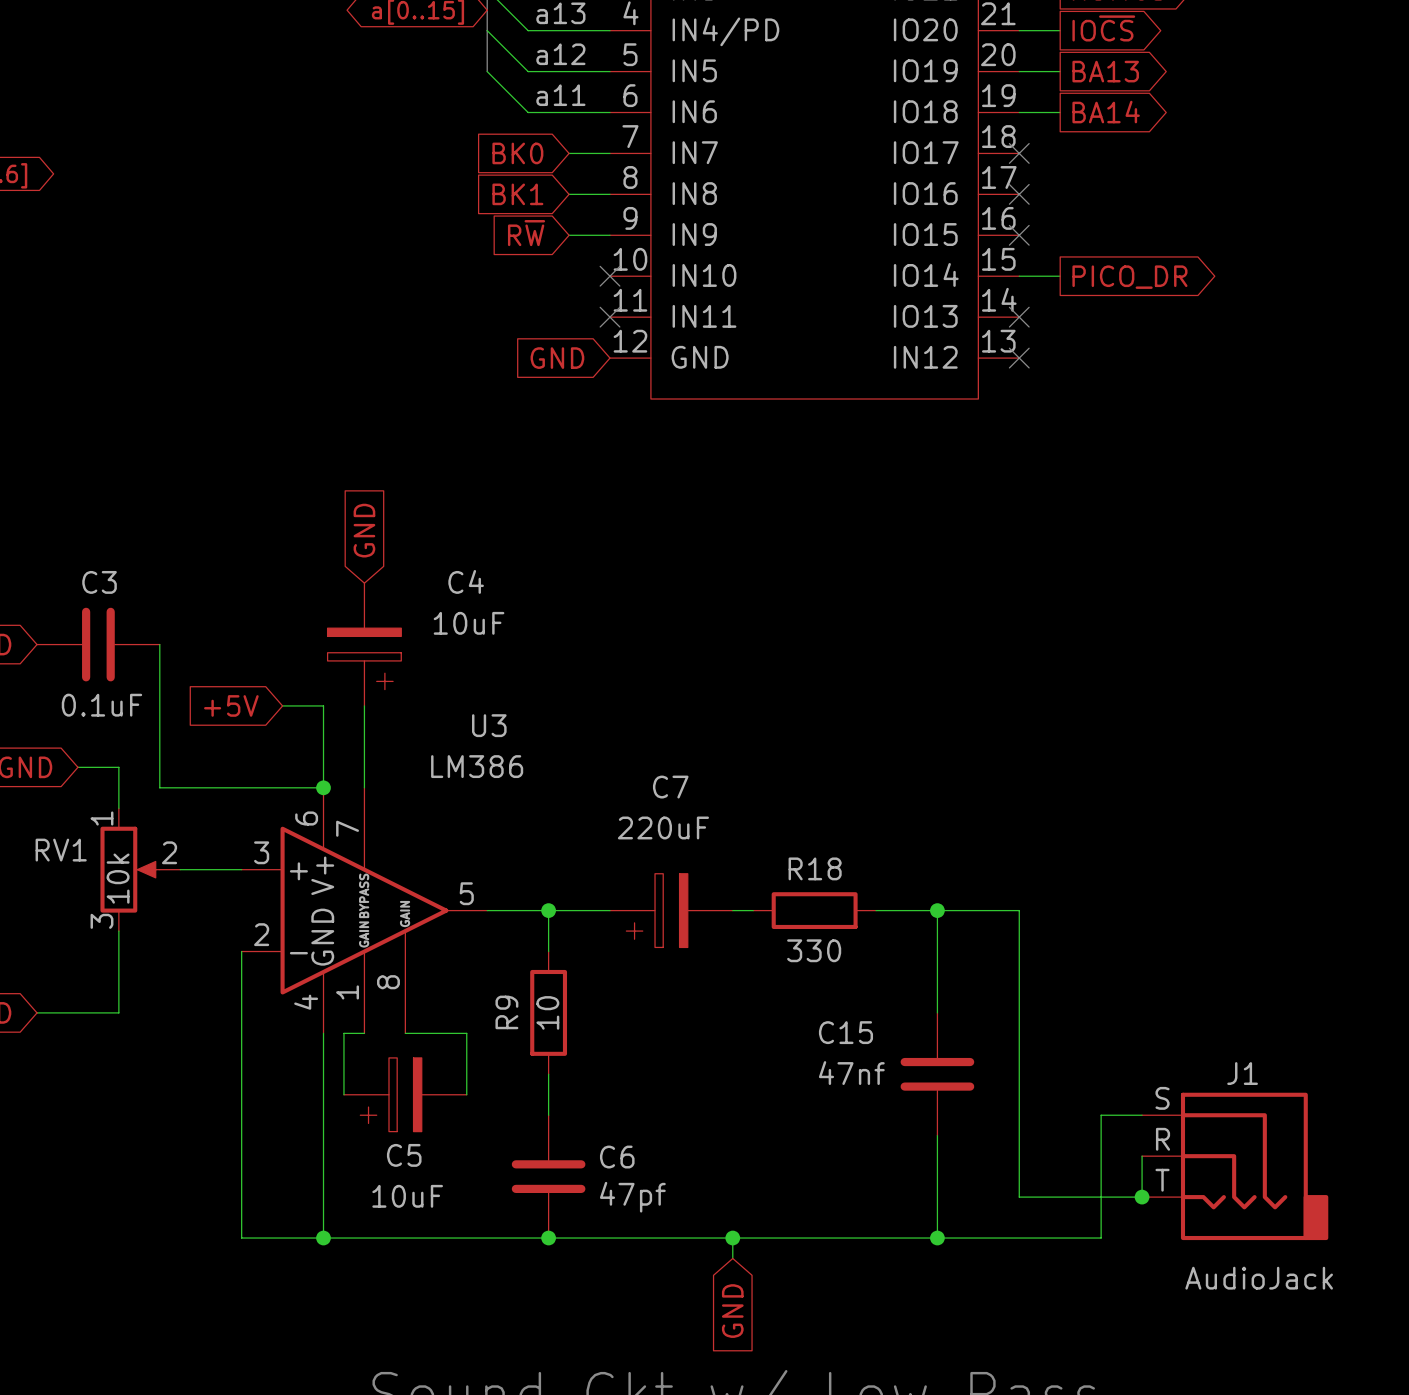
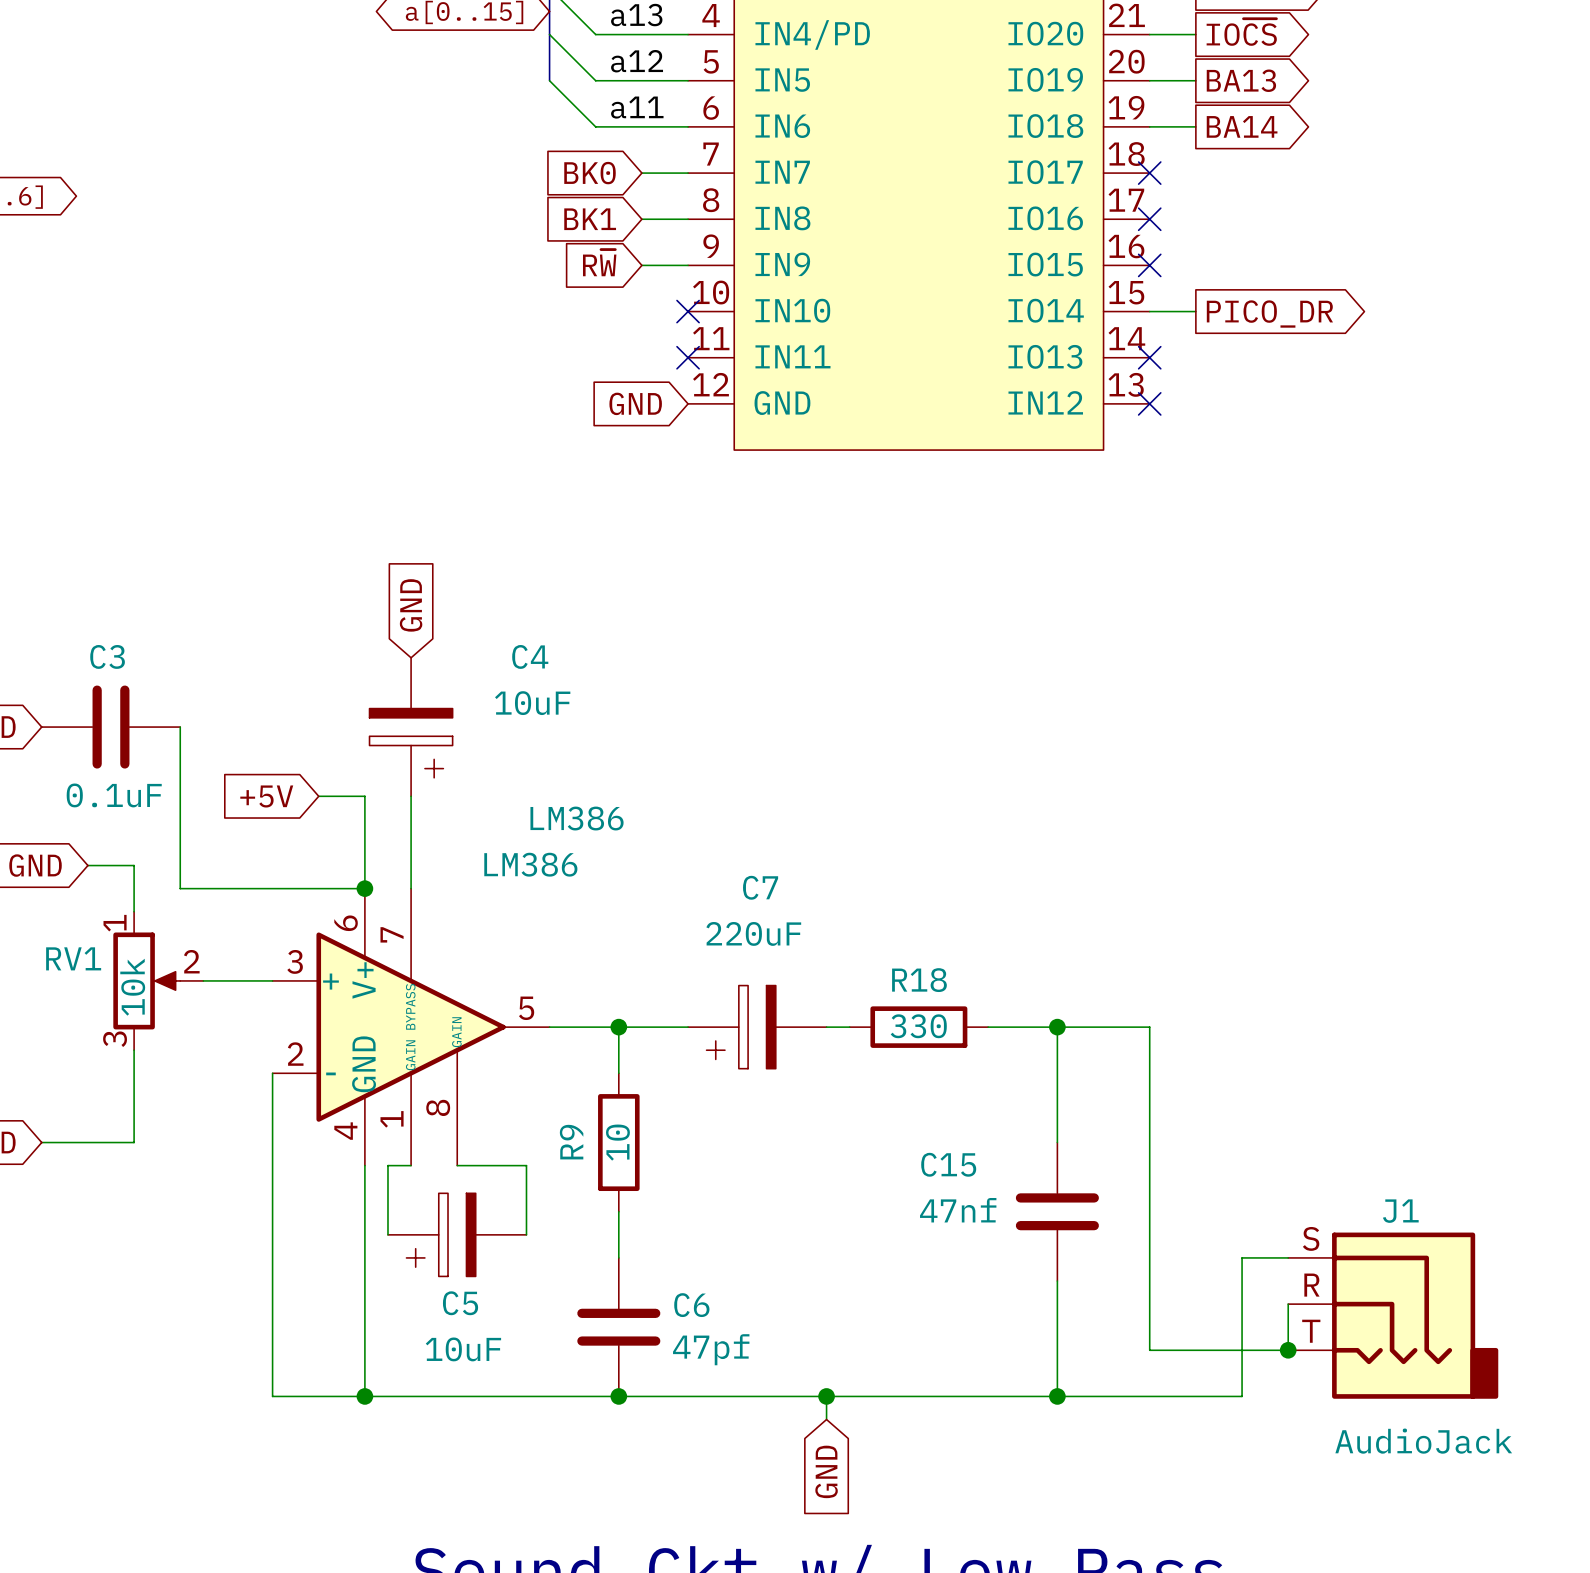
U3 name: U3 (489, 725) -> LM386 (577, 818)
R18 value position: 330 (814, 950) -> 330 (918, 1026)

